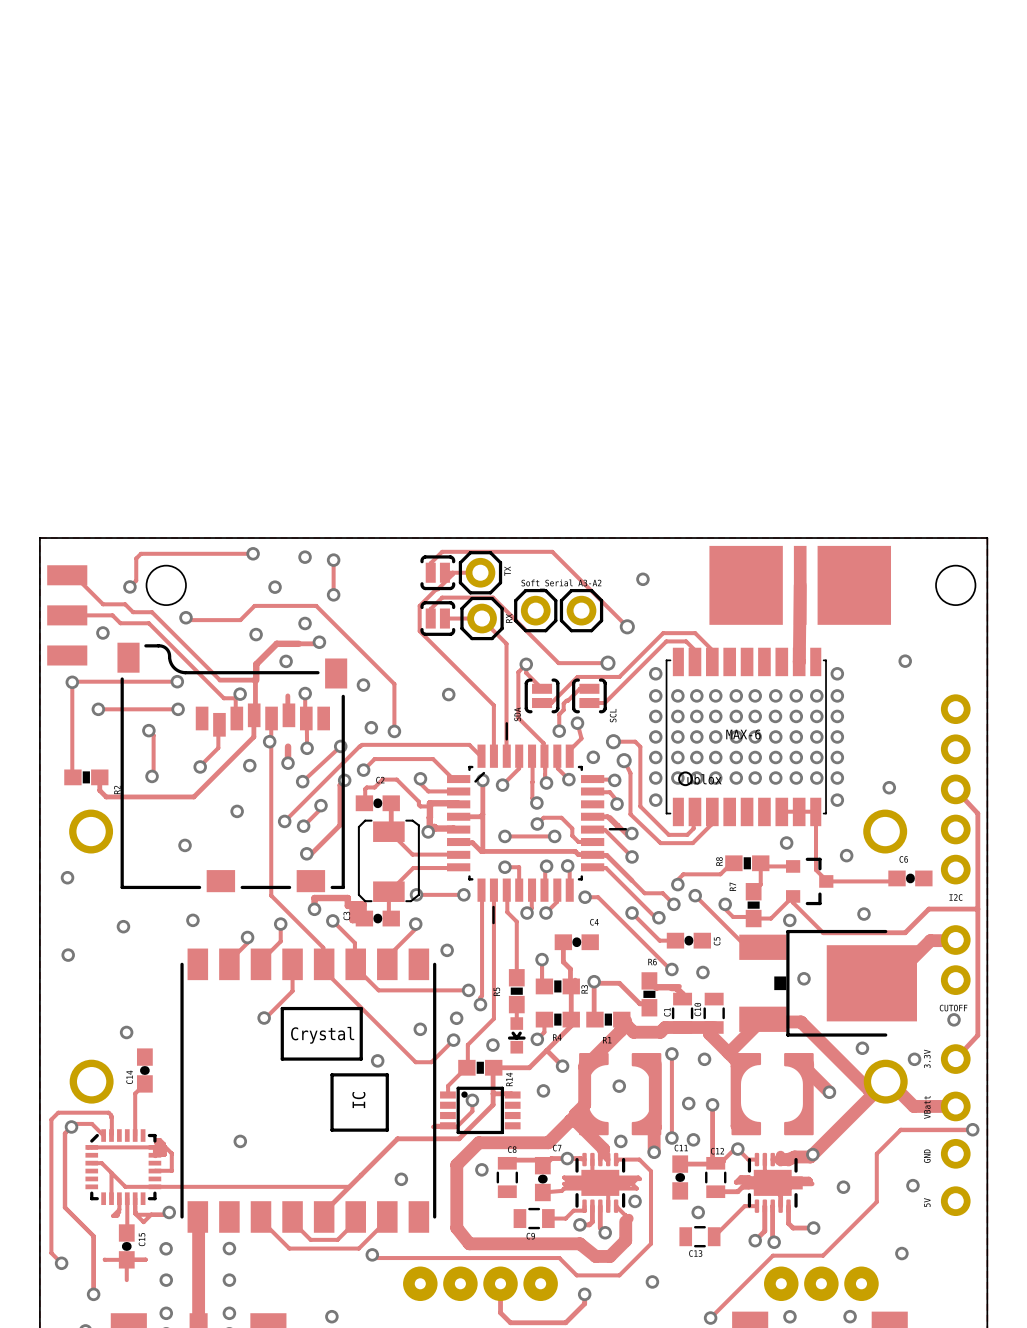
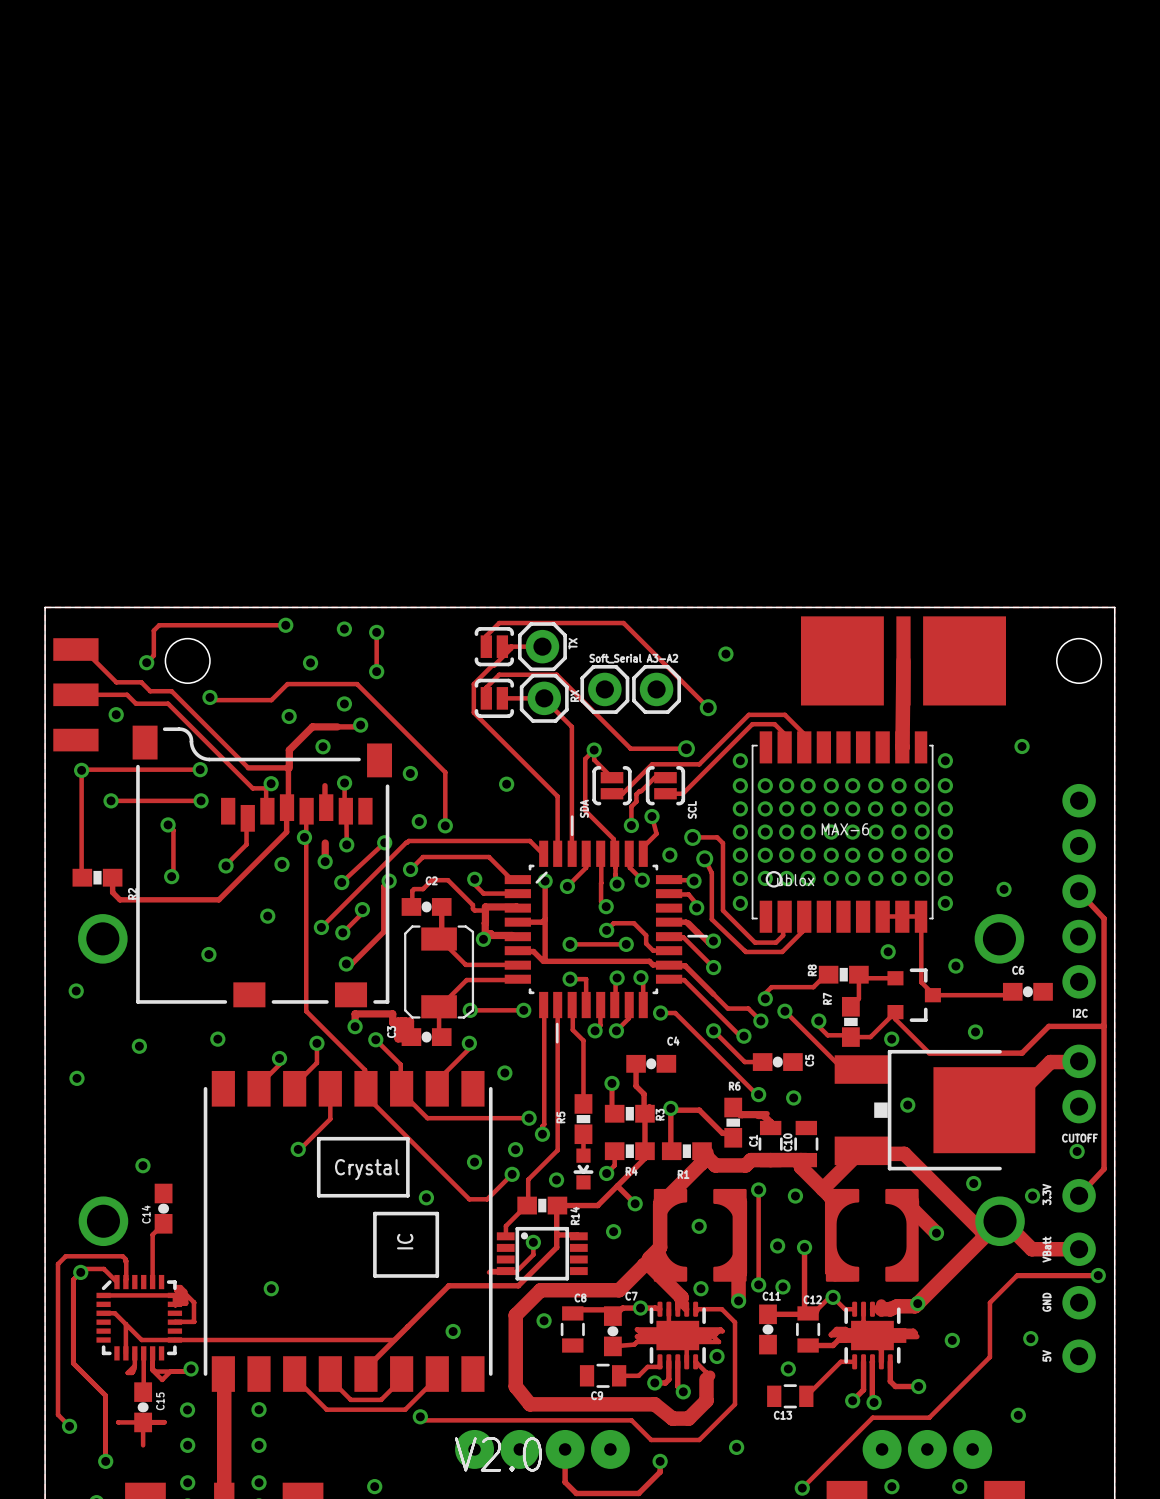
text: none -> V2.0 (498, 1454)

